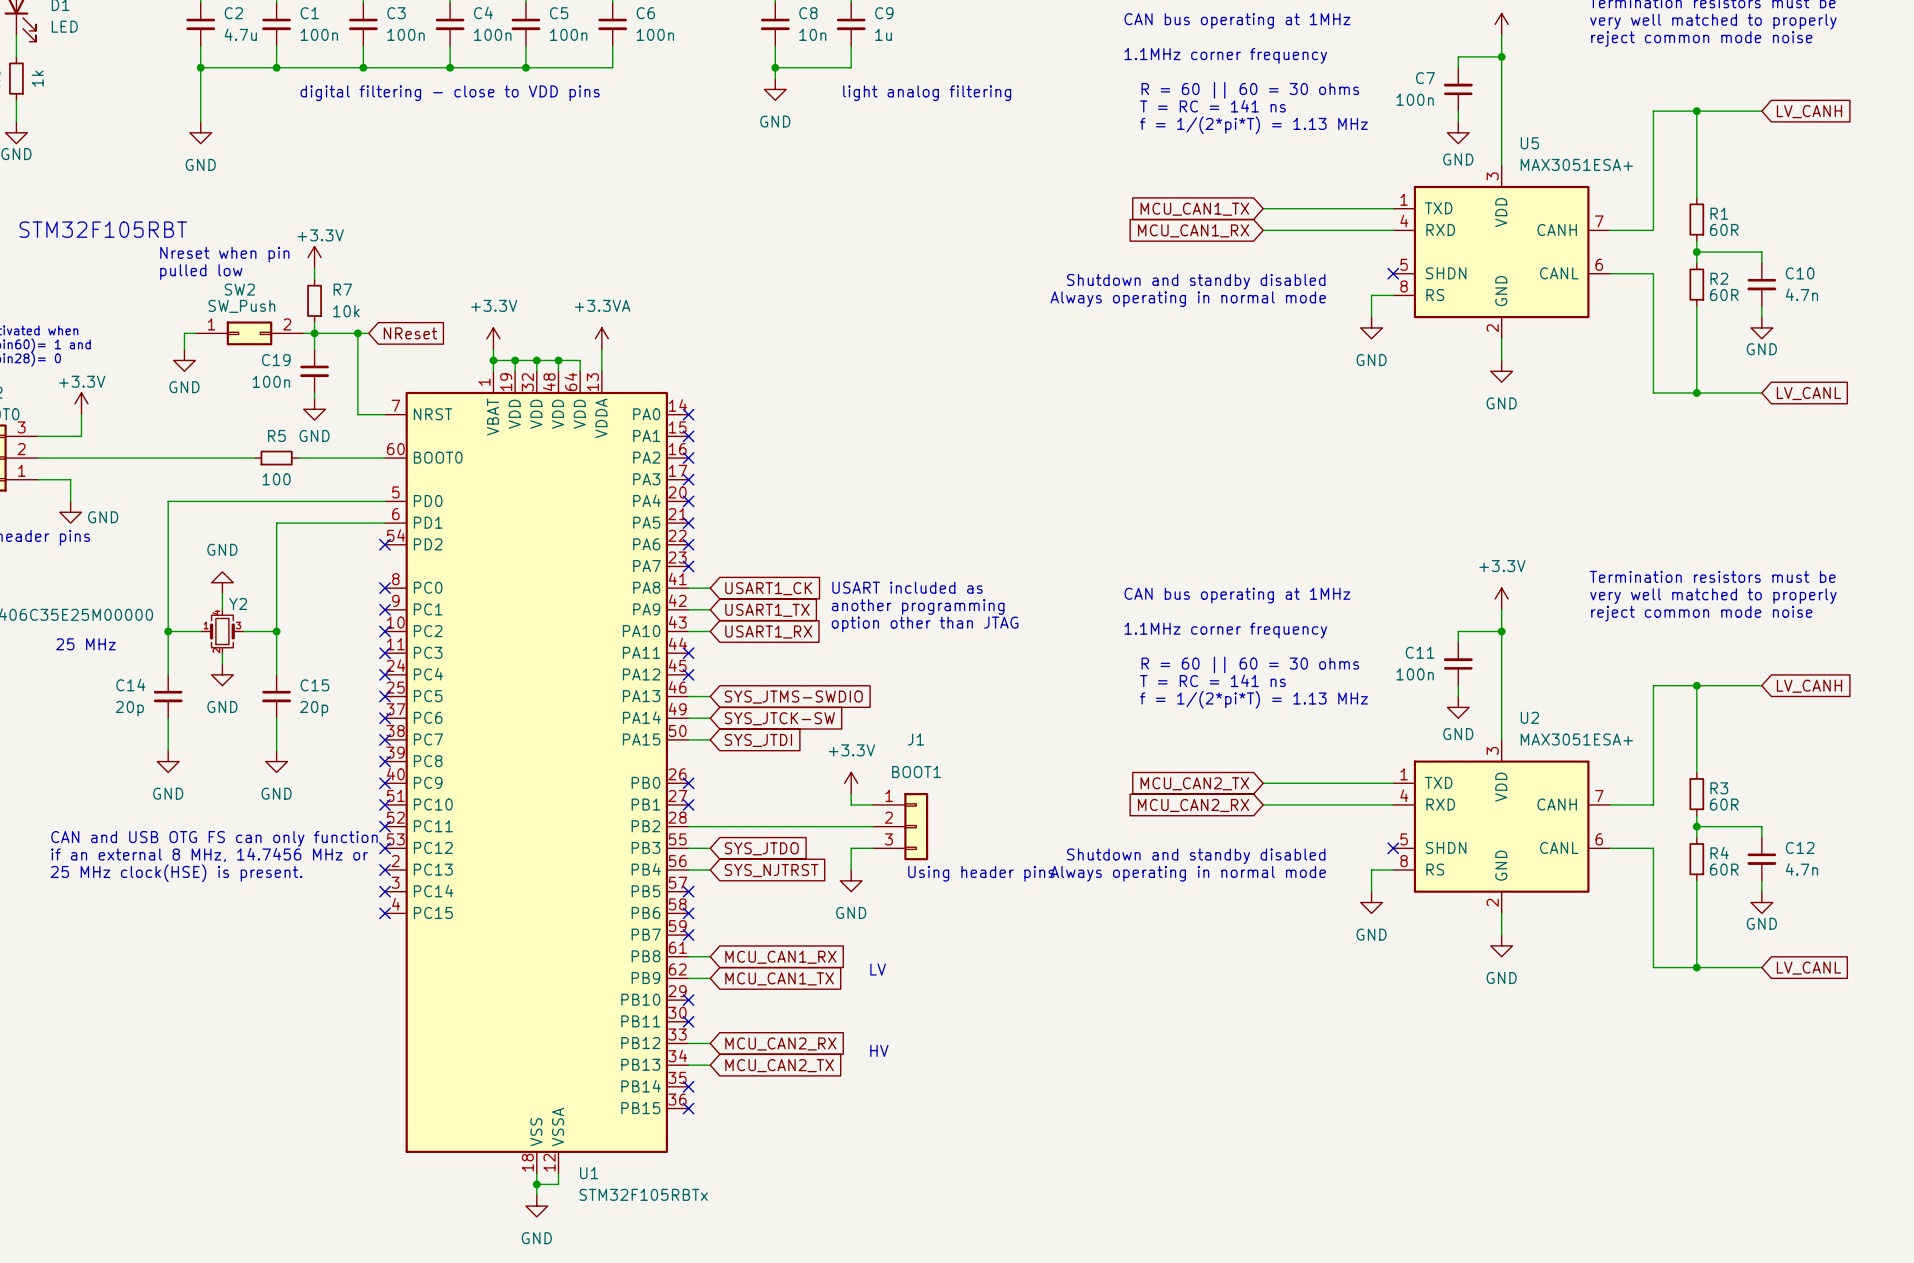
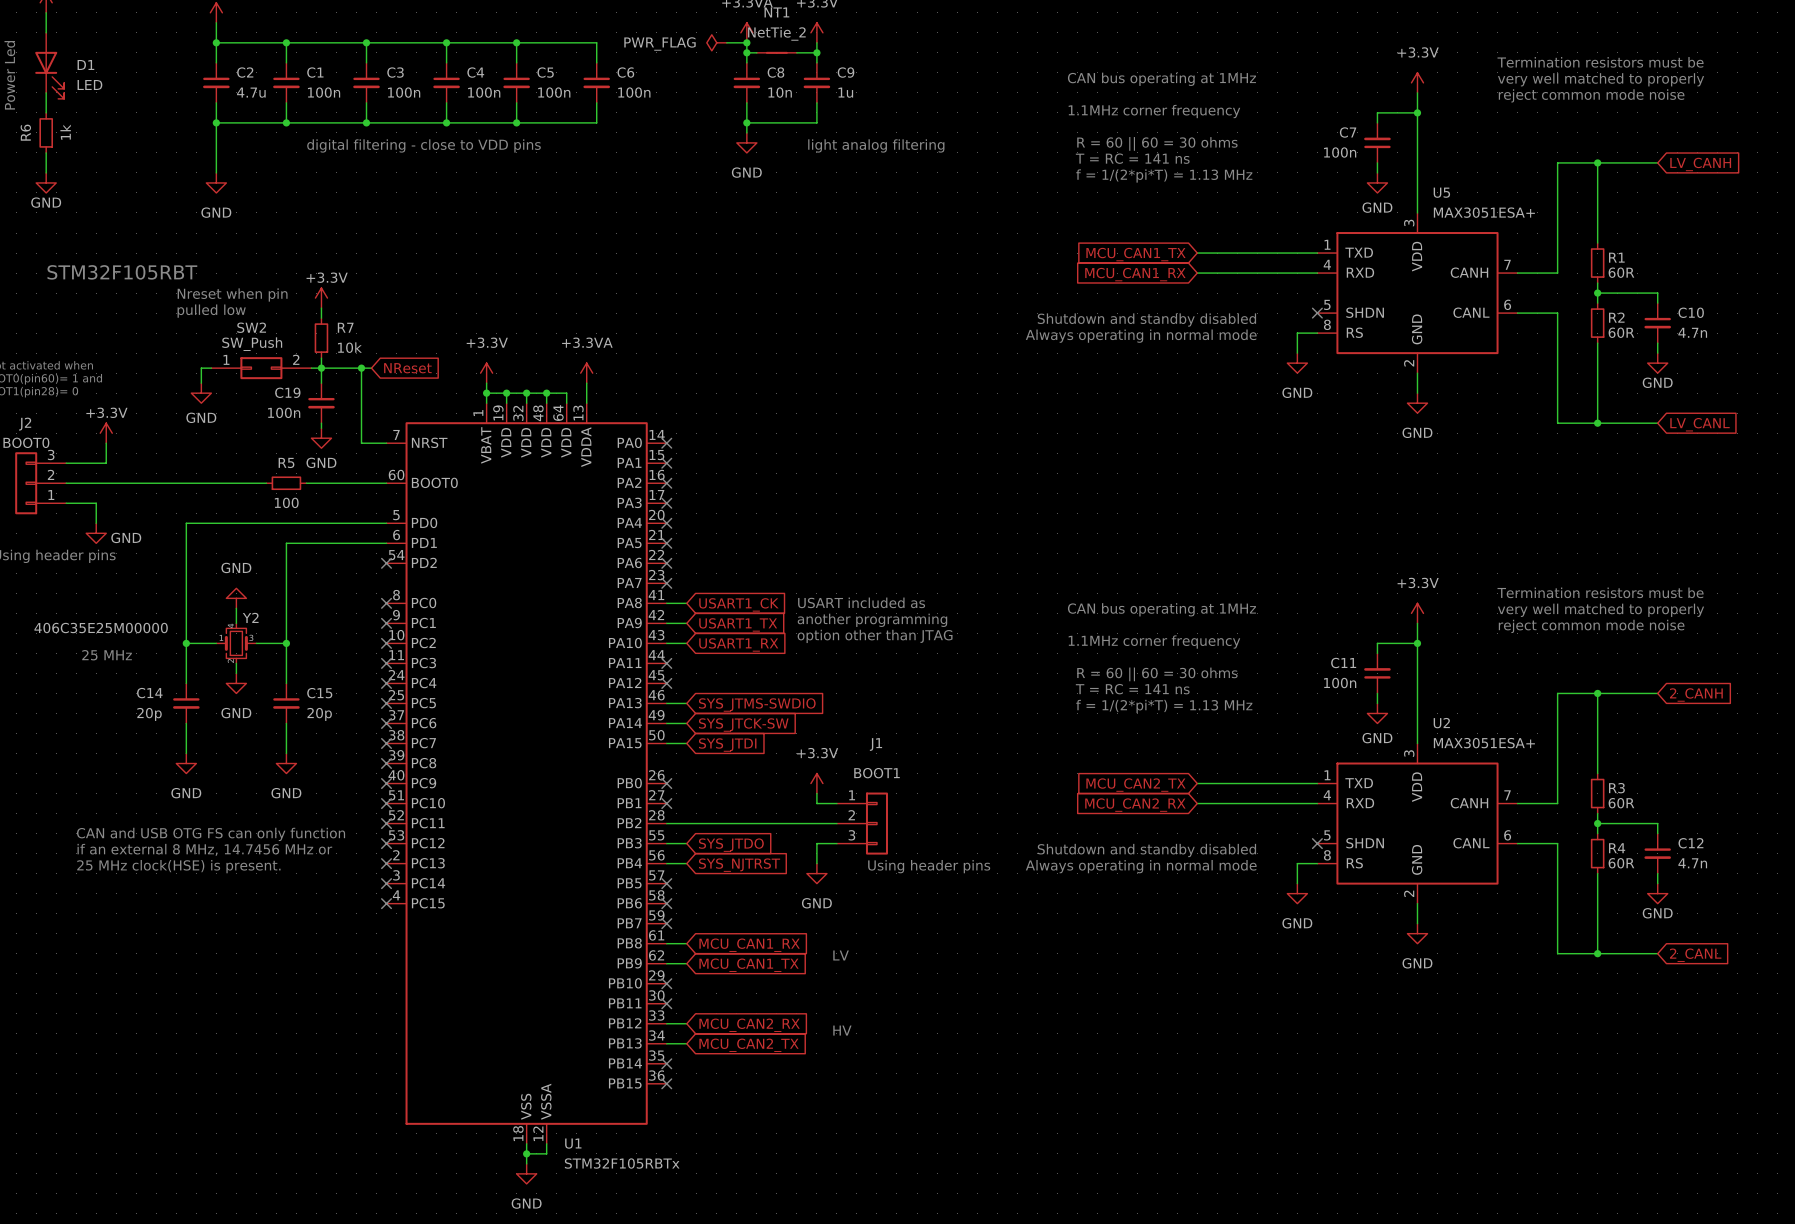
global label: LV_CANH (1809, 686) -> 2_CANH (1696, 694)
global label: LV_CANL (1808, 968) -> 2_CANL (1695, 955)

